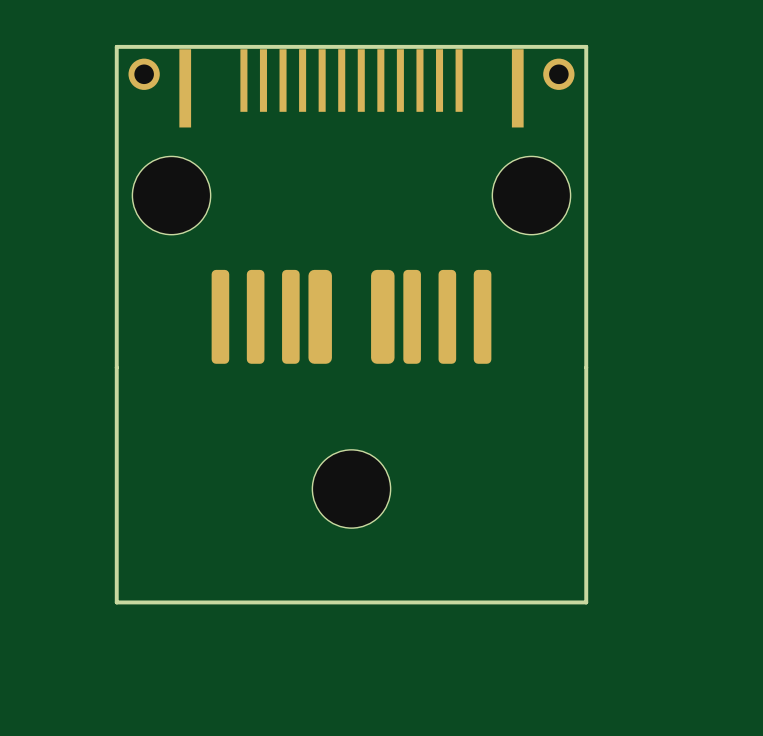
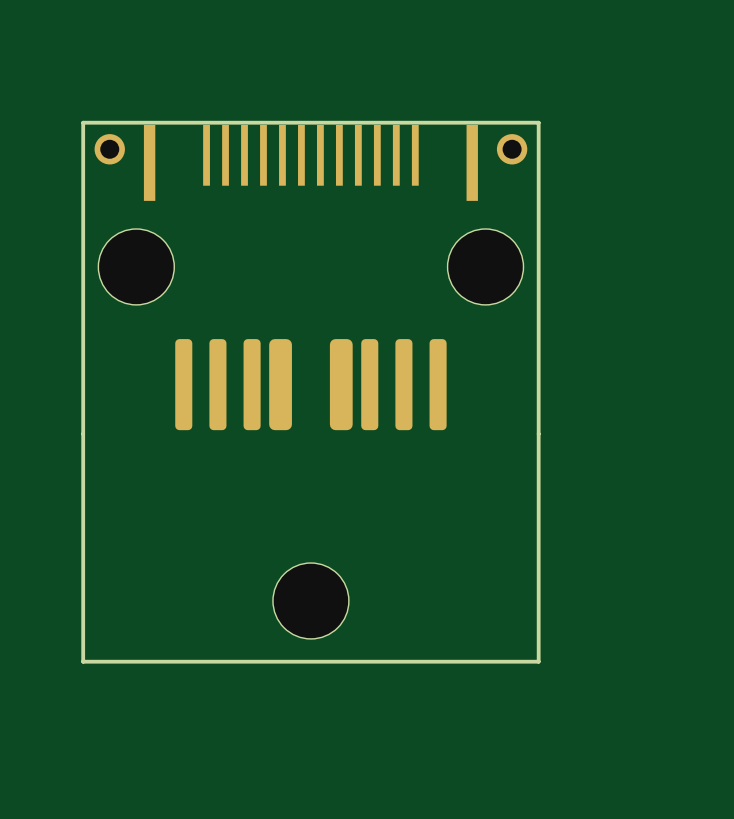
part position: (351, 488) -> (310, 600)

